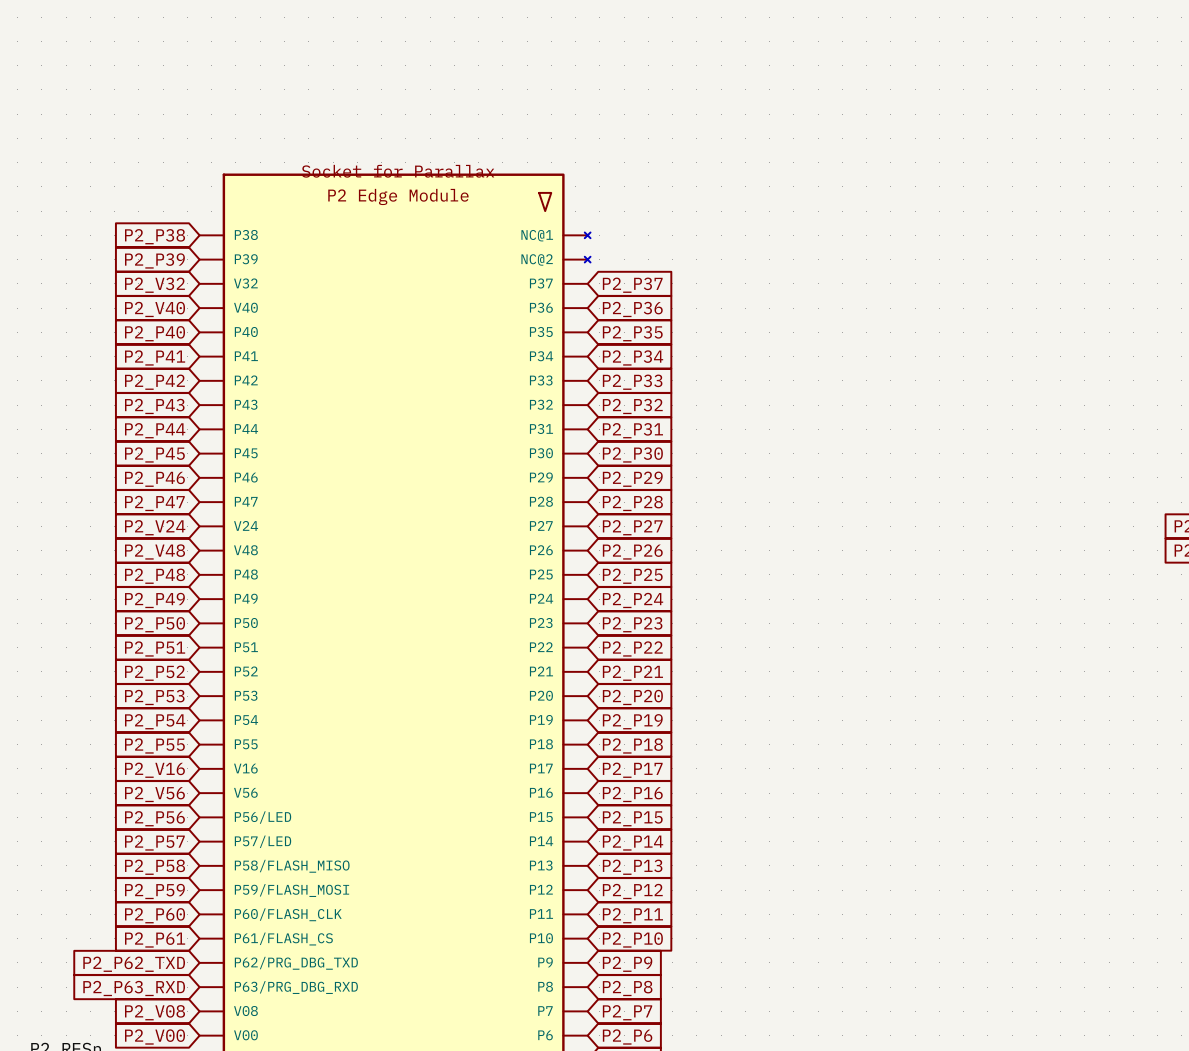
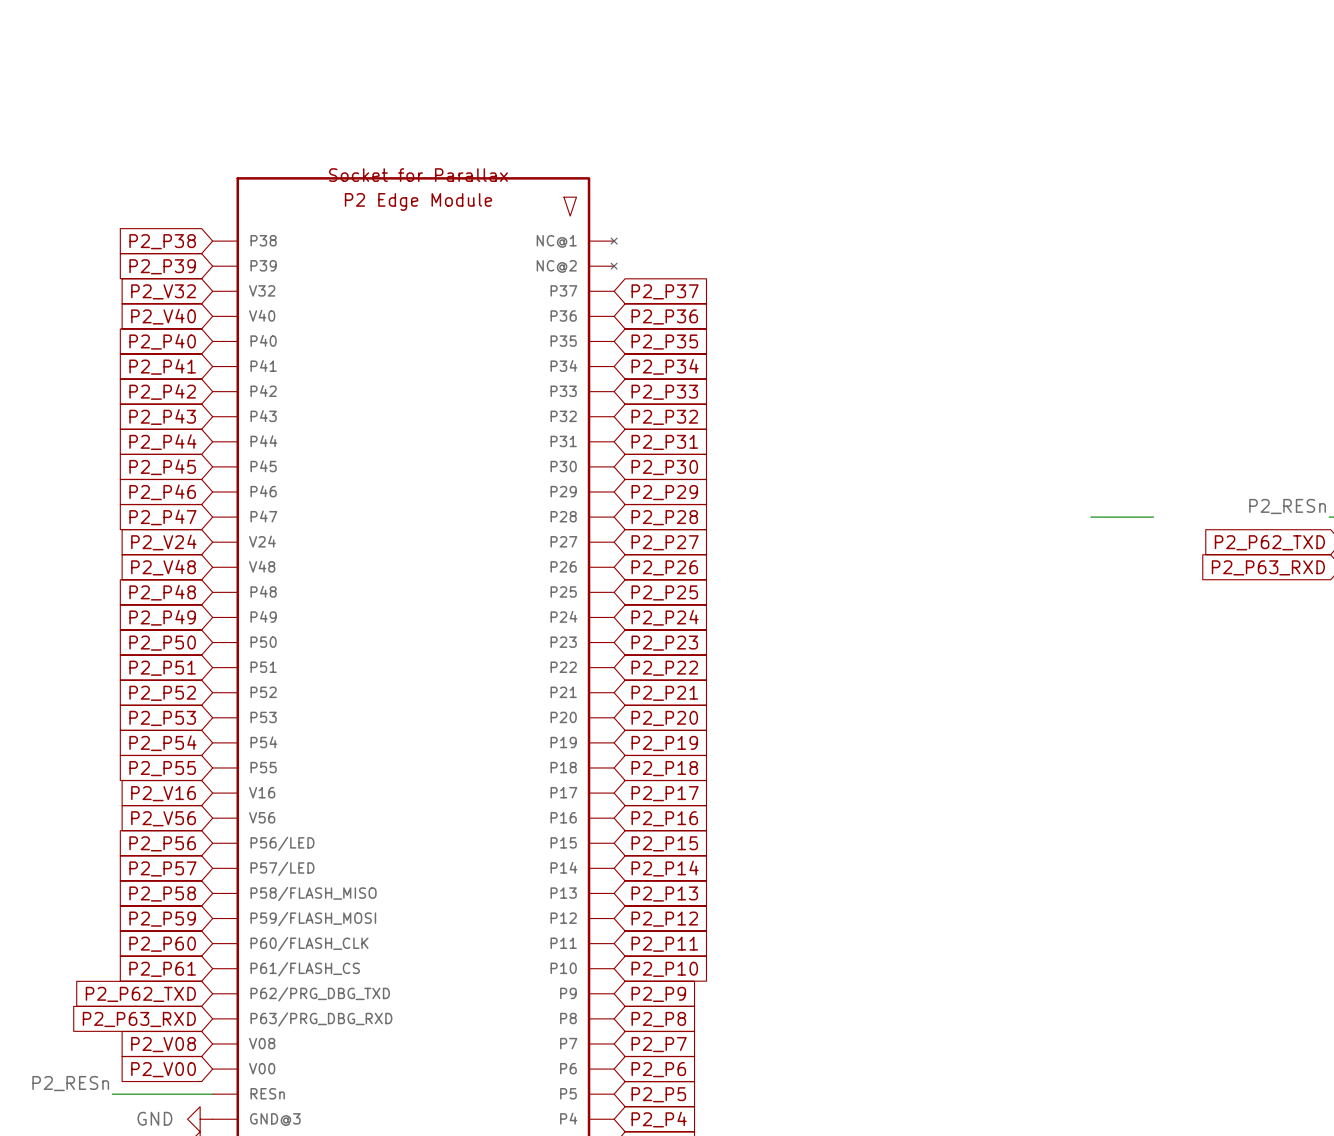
wire: none -> (1090, 517) (1153, 517)

